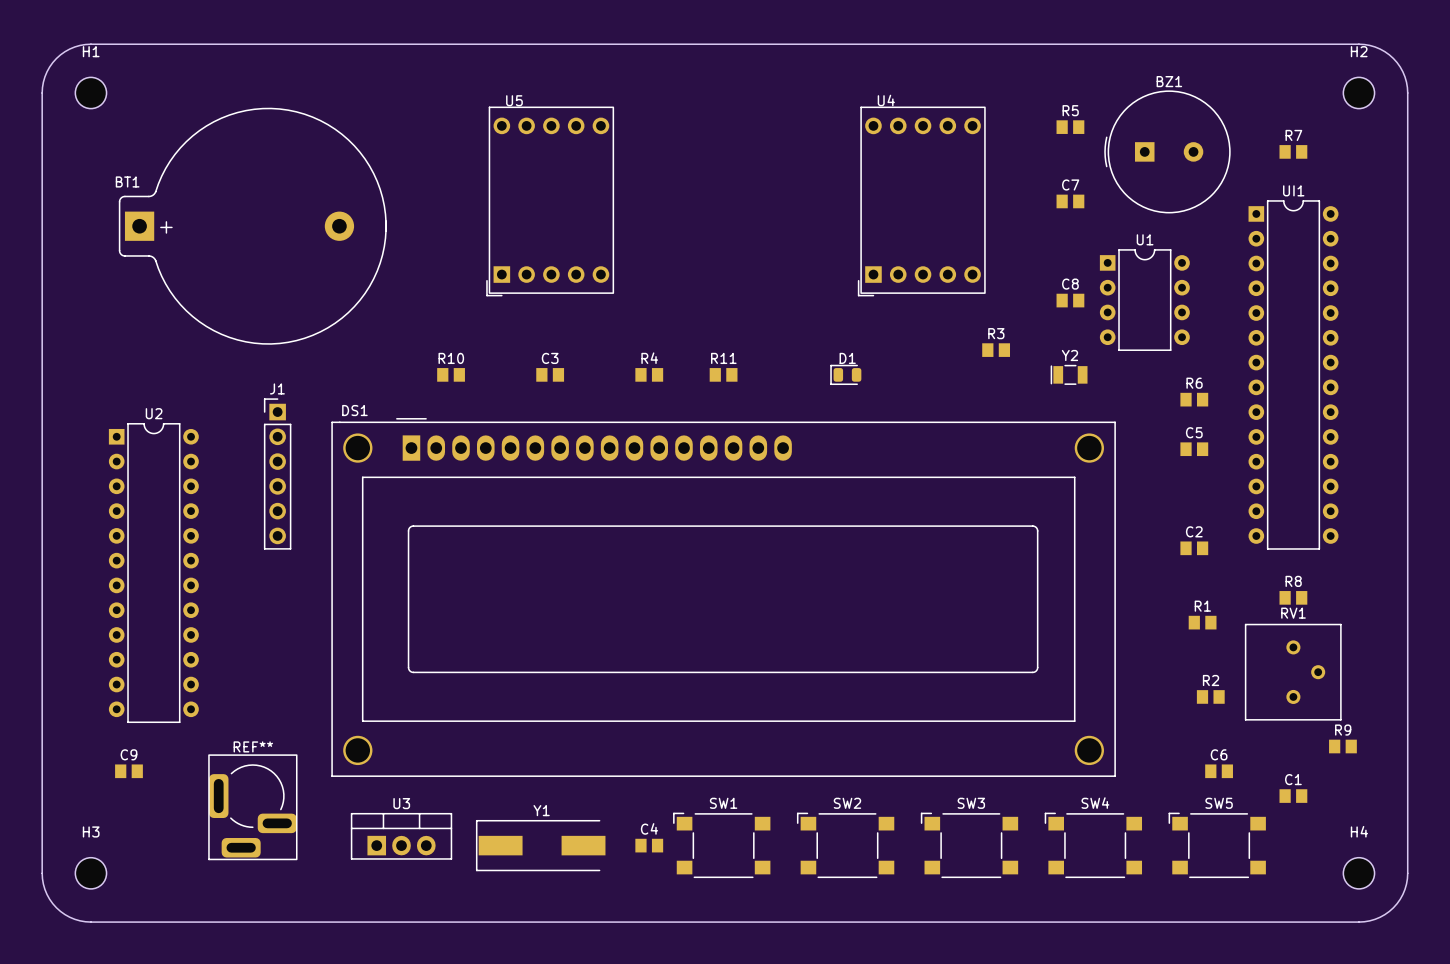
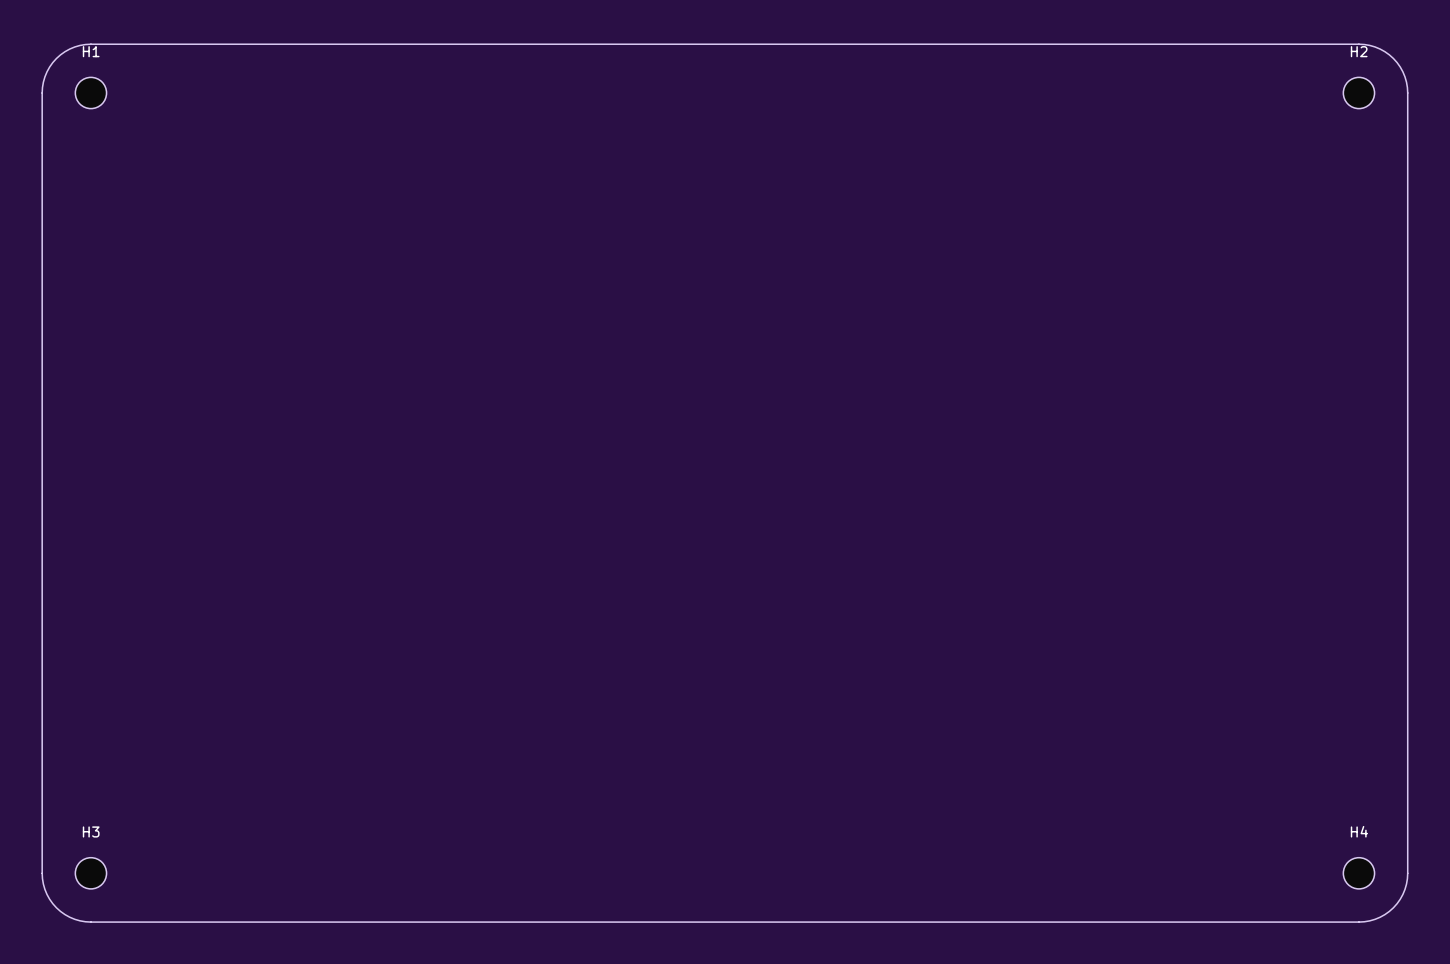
R5: (1070, 127) -> none
BZ1: (1167, 151) -> none
R7: (1293, 151) -> none
U5: (550, 201) -> none
U4: (921, 201) -> none
C7: (1070, 201) -> none
BT1: (252, 226) -> none
C8: (1070, 300) -> none
U1: (1144, 300) -> none
R3: (996, 350) -> none
R10: (451, 374) -> none
C3: (550, 374) -> none
R4: (649, 374) -> none
R11: (723, 374) -> none
D1: (845, 374) -> none
Y2: (1069, 374) -> none
UI1: (1293, 374) -> none
R6: (1194, 399) -> none
C5: (1194, 449) -> none
J1: (277, 473) -> none
C2: (1194, 548) -> none
U2: (153, 573) -> none
DS1: (723, 597) -> none
R8: (1293, 597) -> none
R1: (1202, 622) -> none
RV1: (1293, 672) -> none
R2: (1210, 696) -> none
R9: (1342, 746) -> none
C9: (128, 771) -> none
C6: (1219, 771) -> none
C1: (1293, 796) -> none
part: (252, 807) -> none
U3: (401, 836) -> none
Y1: (540, 845) -> none
C4: (649, 845) -> none
SW1: (721, 845) -> none
SW2: (845, 845) -> none
SW3: (969, 845) -> none
SW4: (1093, 845) -> none
SW5: (1217, 845) -> none

